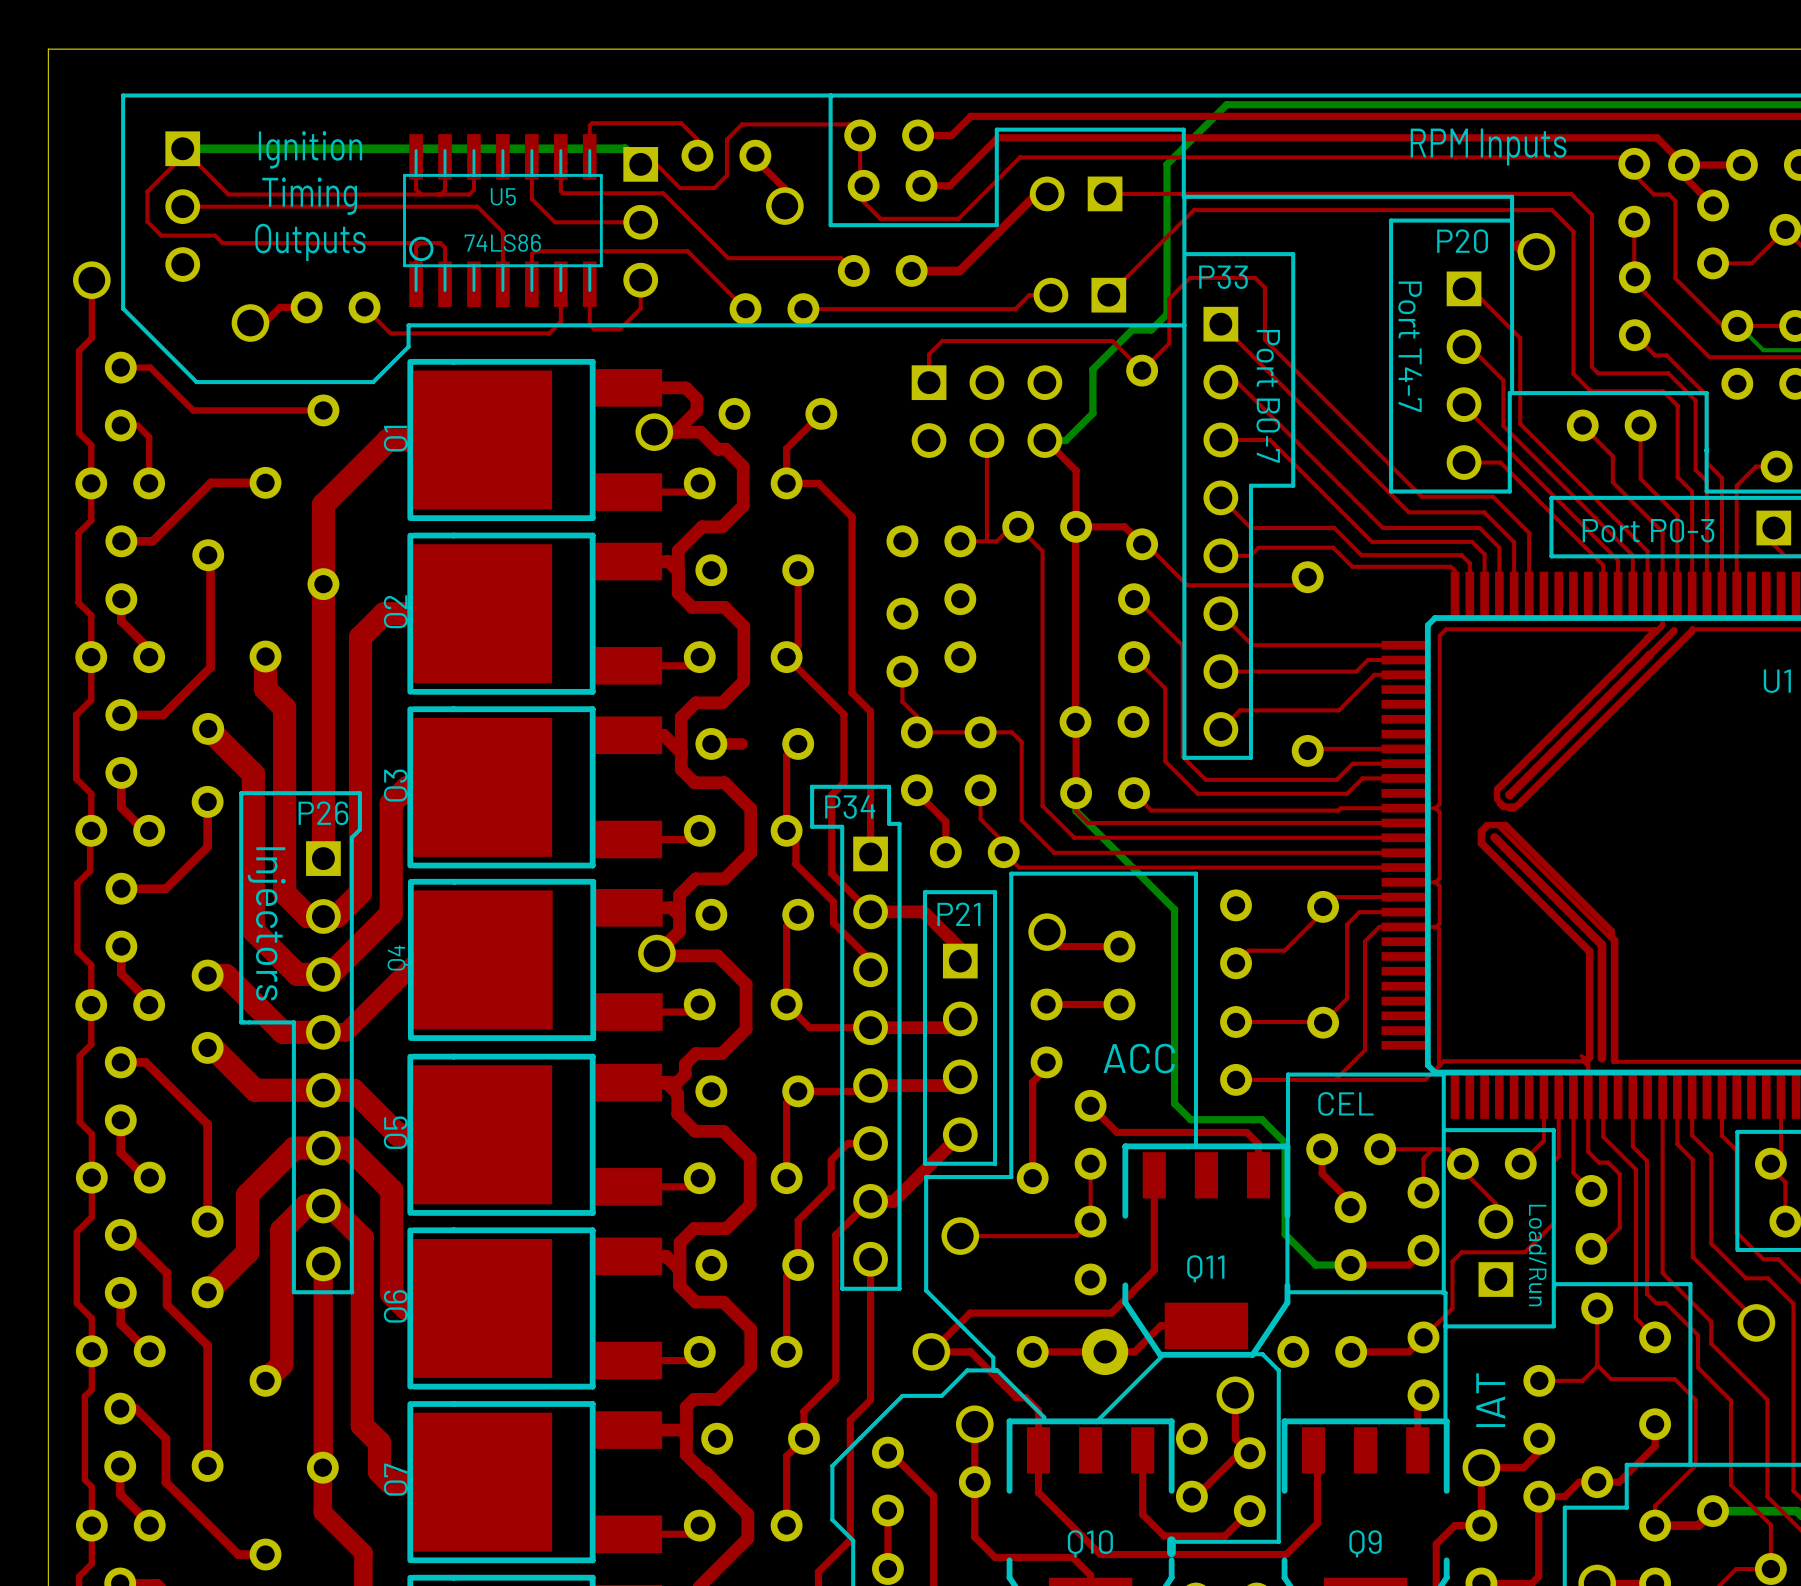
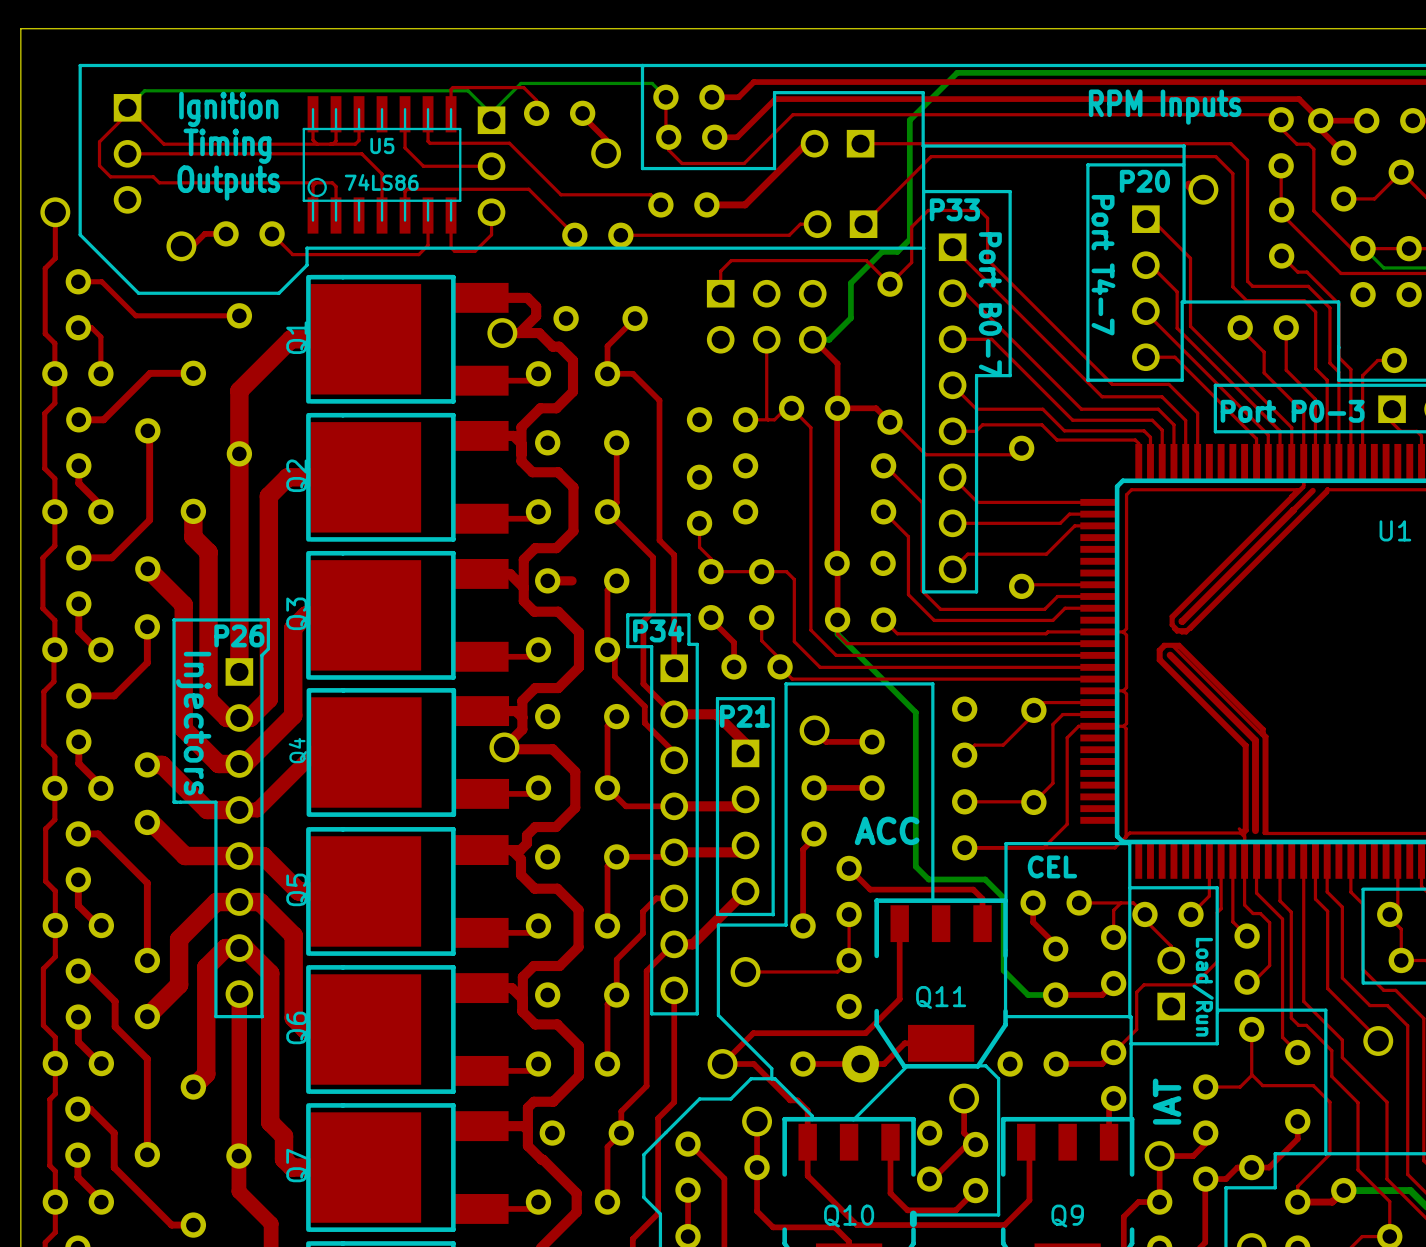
top track: (860, 135) (849, 124) (742, 124) (726, 139) (726, 175) (714, 188) (680, 188) (656, 164) (640, 164) -> none
bottom track: none -> (665, 97) (652, 83) (521, 83) (491, 112) (491, 120)
bottom track: (182, 148) (625, 148) (640, 164) -> (127, 107) (144, 90) (468, 90) (491, 114)

